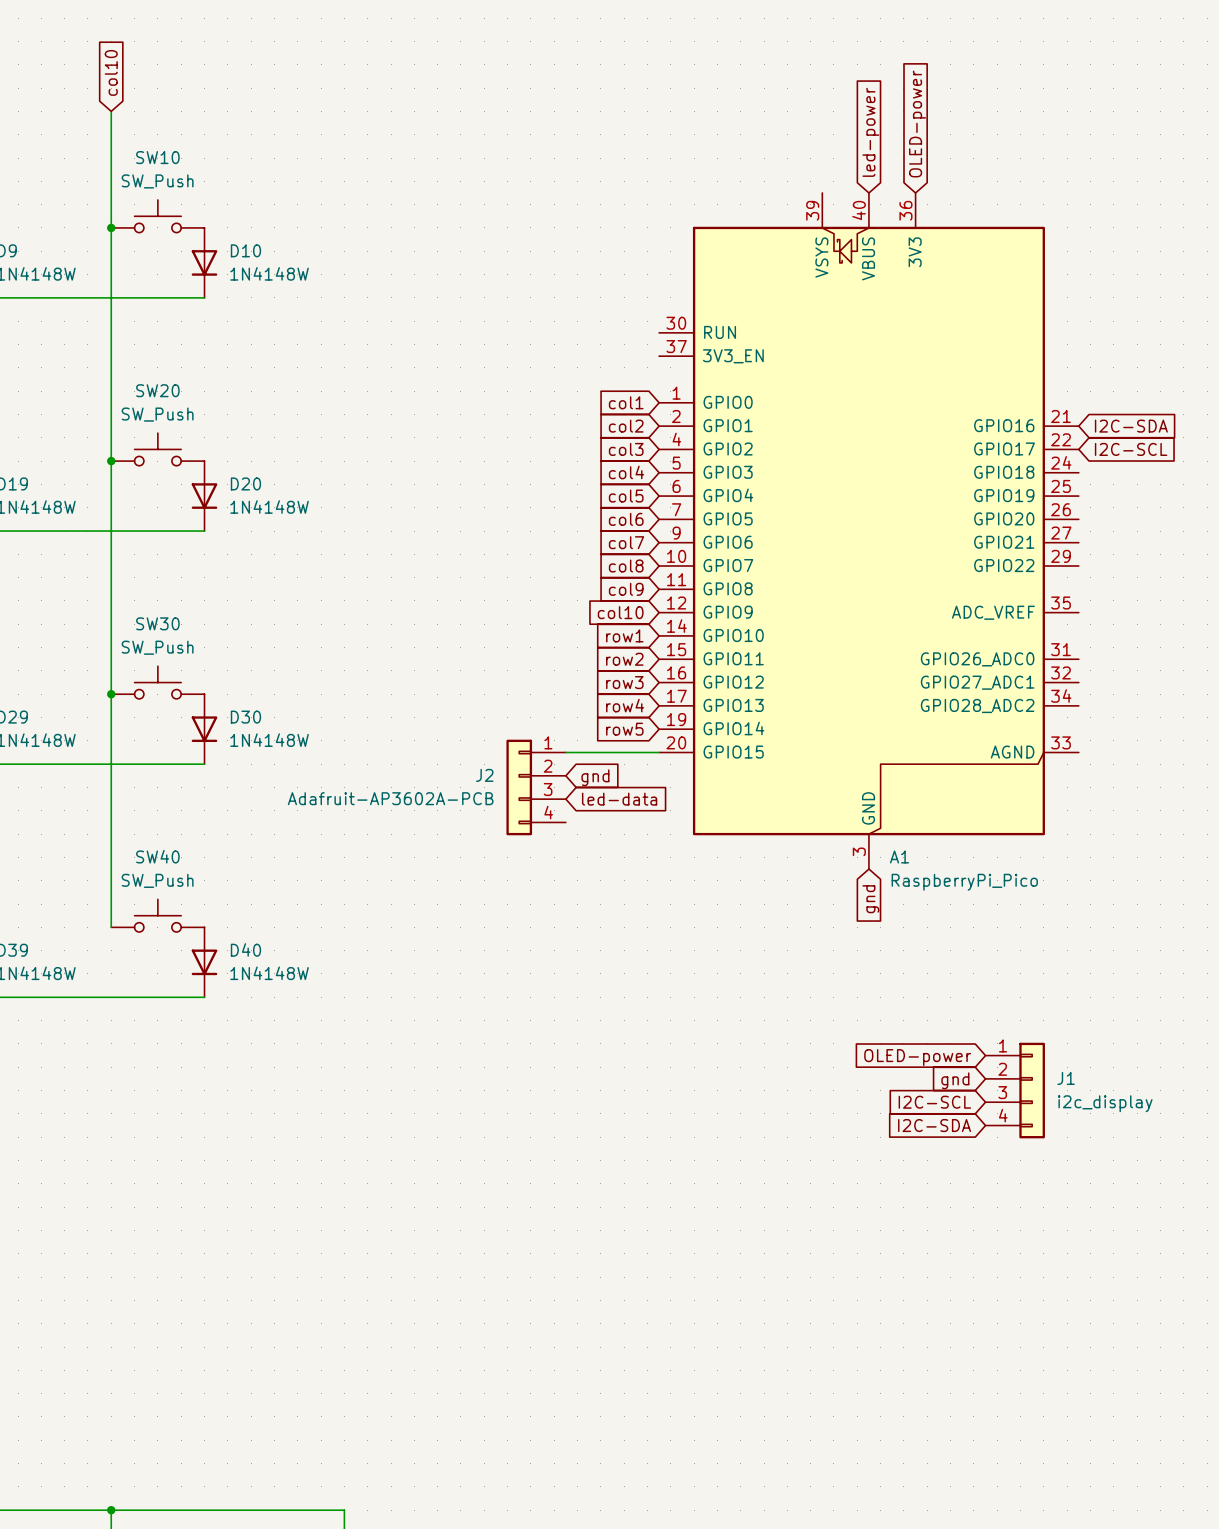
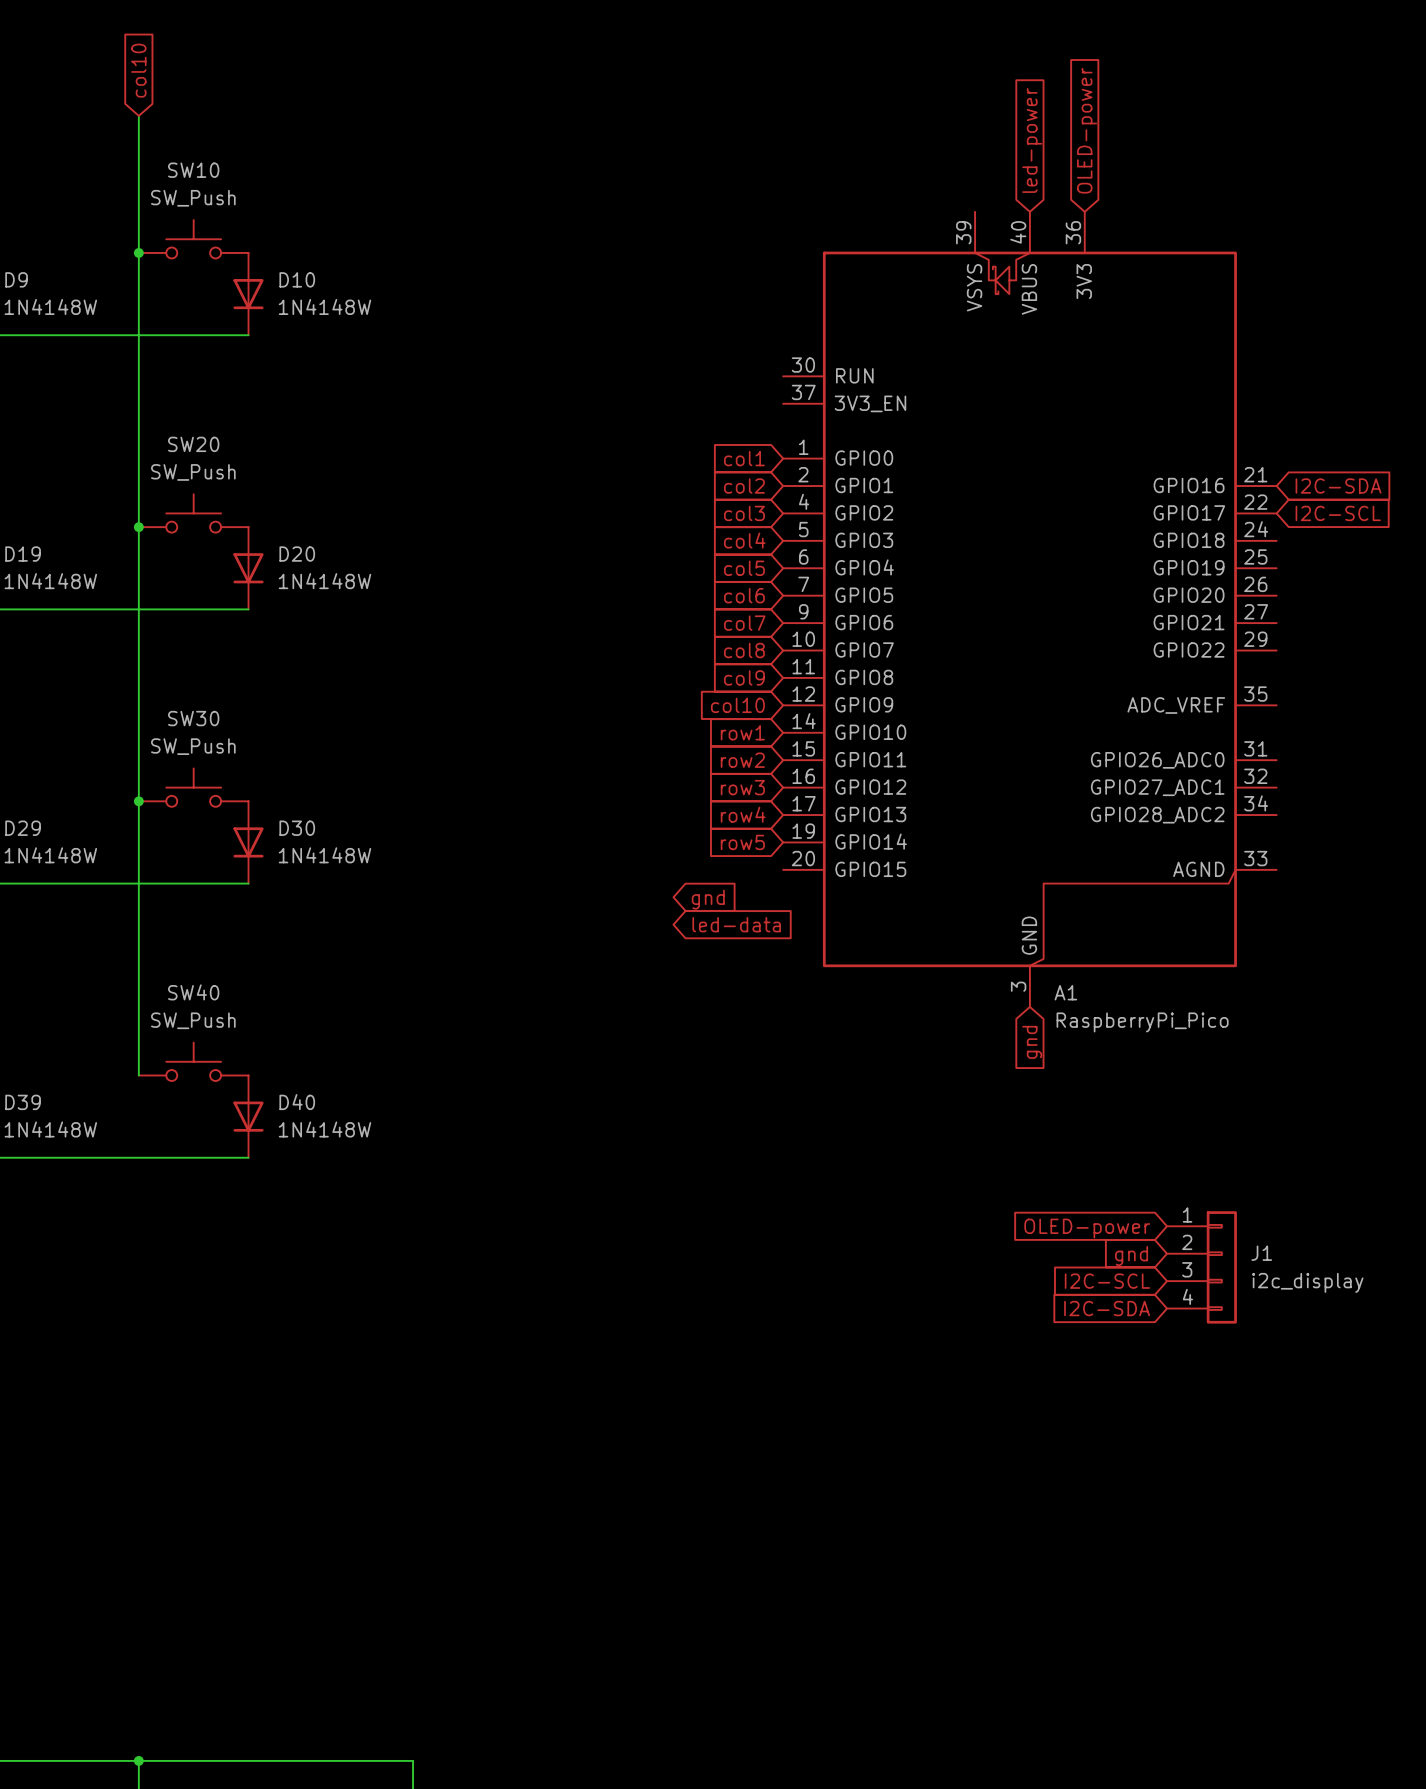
wire: (565, 752) (659, 752) -> none
J2: Adafruit-AP3602A-PCB (536, 787) -> none

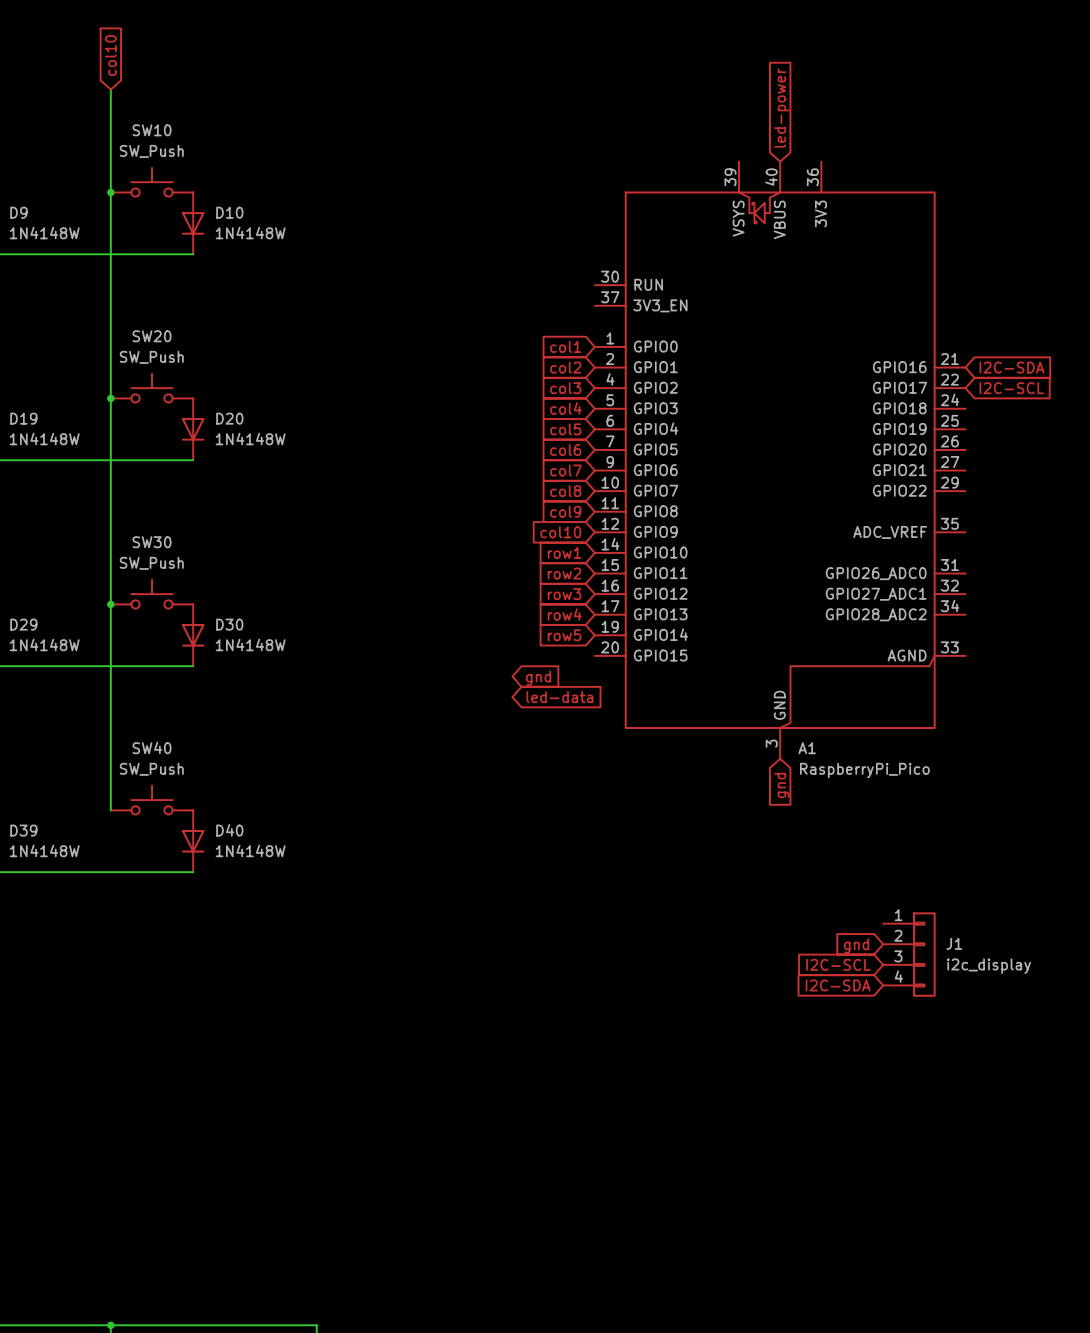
global label: OLED-power (1087, 130) -> none
global label: OLED-power (1087, 1228) -> none

